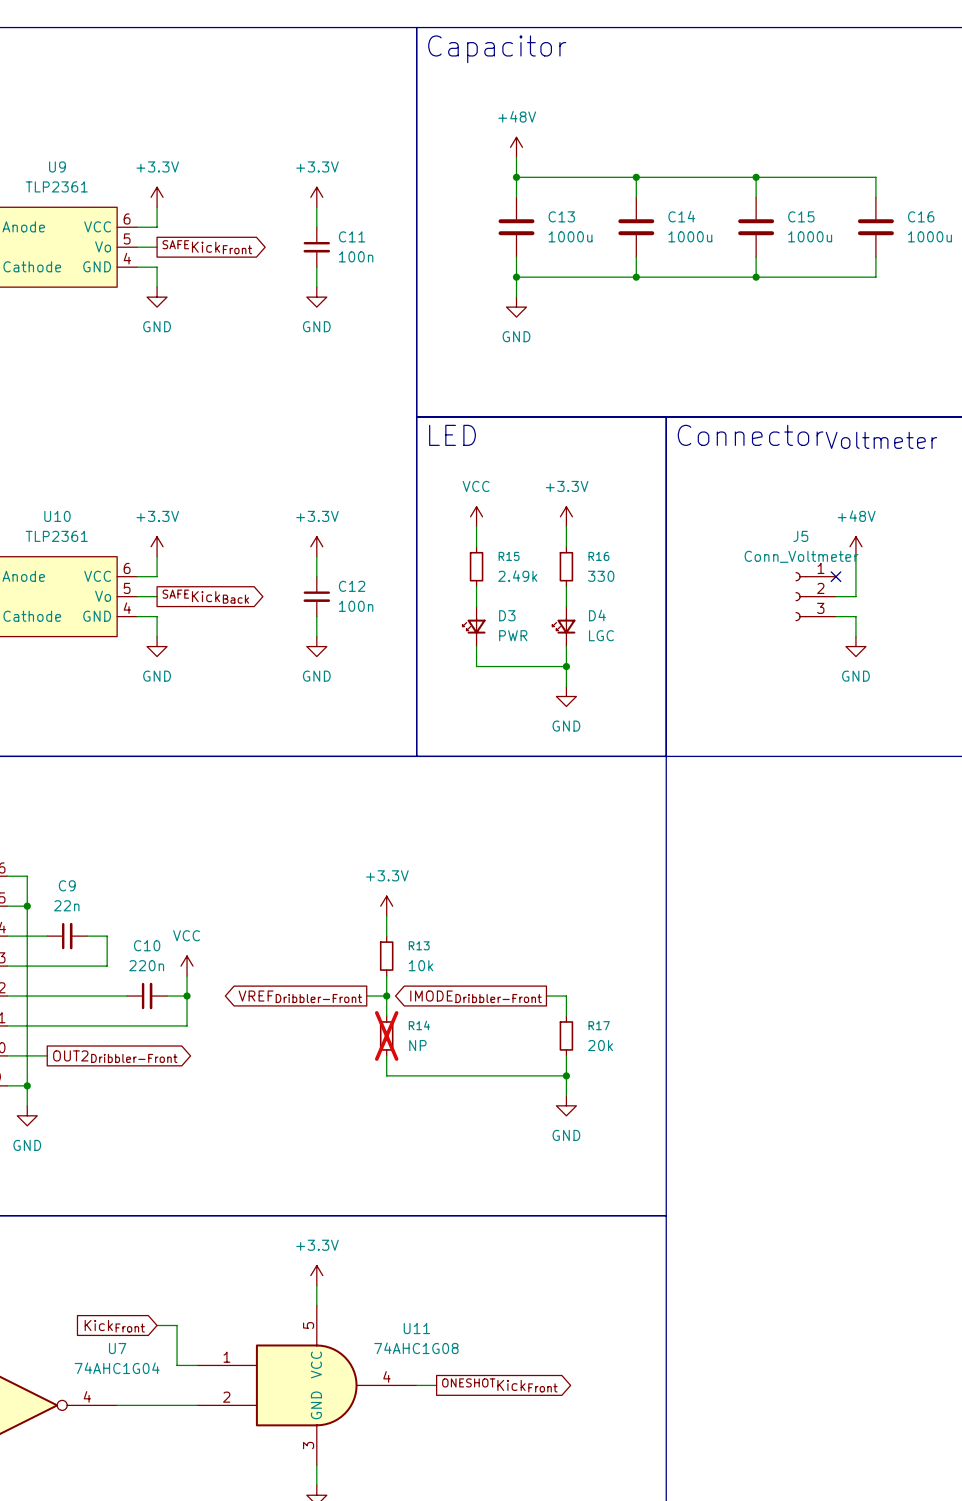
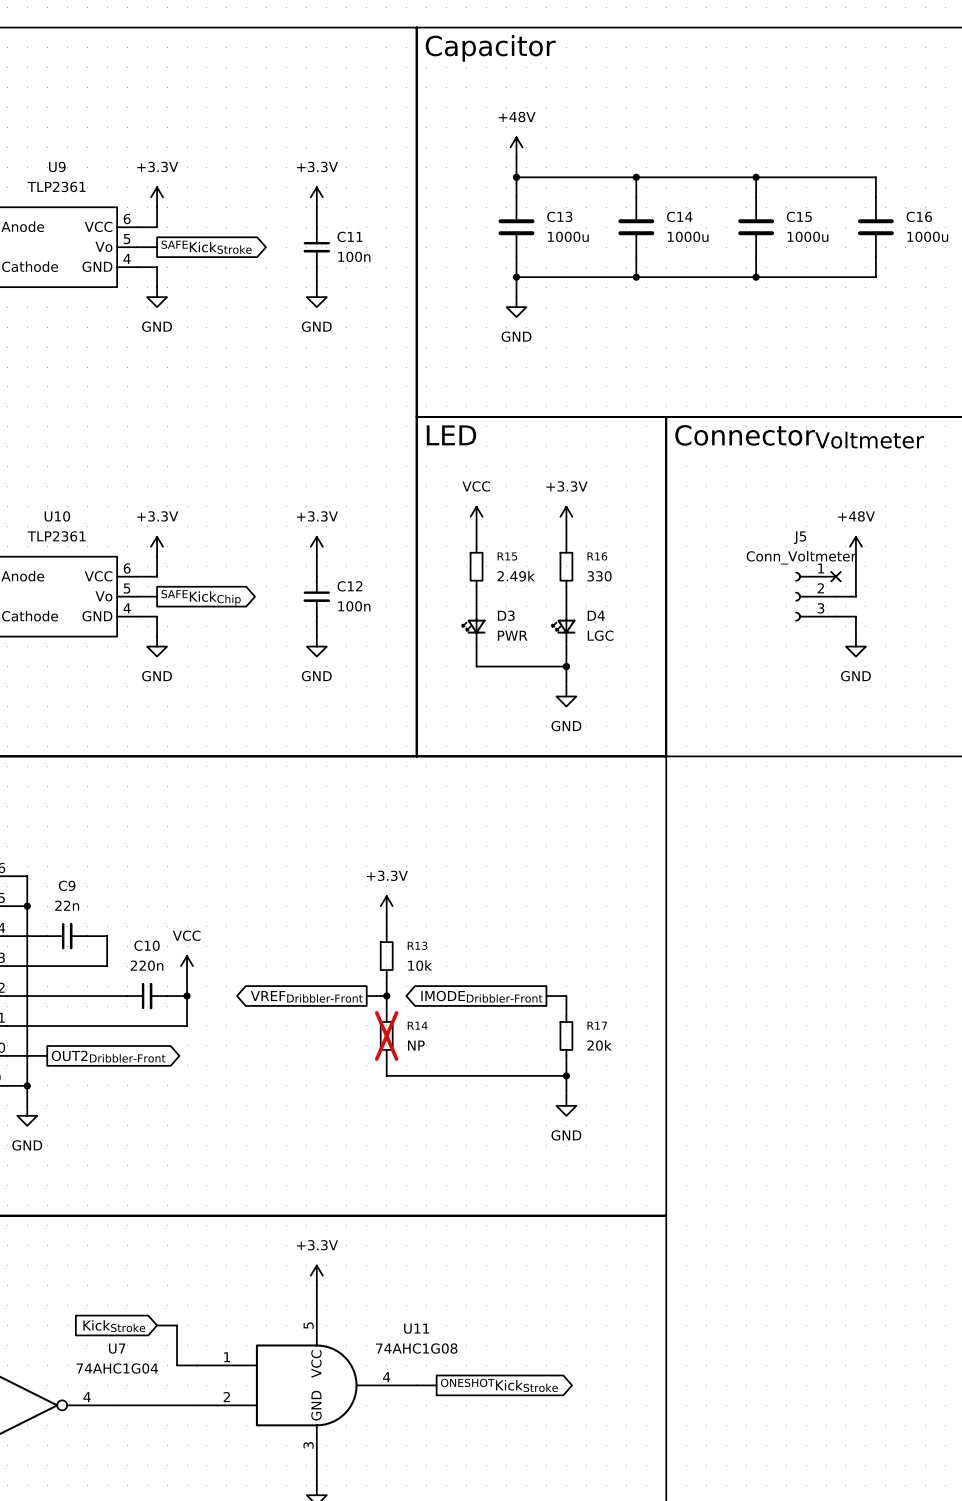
global label: SAFEKickFront (207, 247) -> SAFEKickStroke (206, 247)
global label: SAFEKickBack (205, 596) -> SAFEKickChip (201, 597)
global label: KickFront (114, 1326) -> KickStroke (114, 1326)
global label: ONESHOTKickFront (499, 1385) -> ONESHOTKickStroke (499, 1385)

